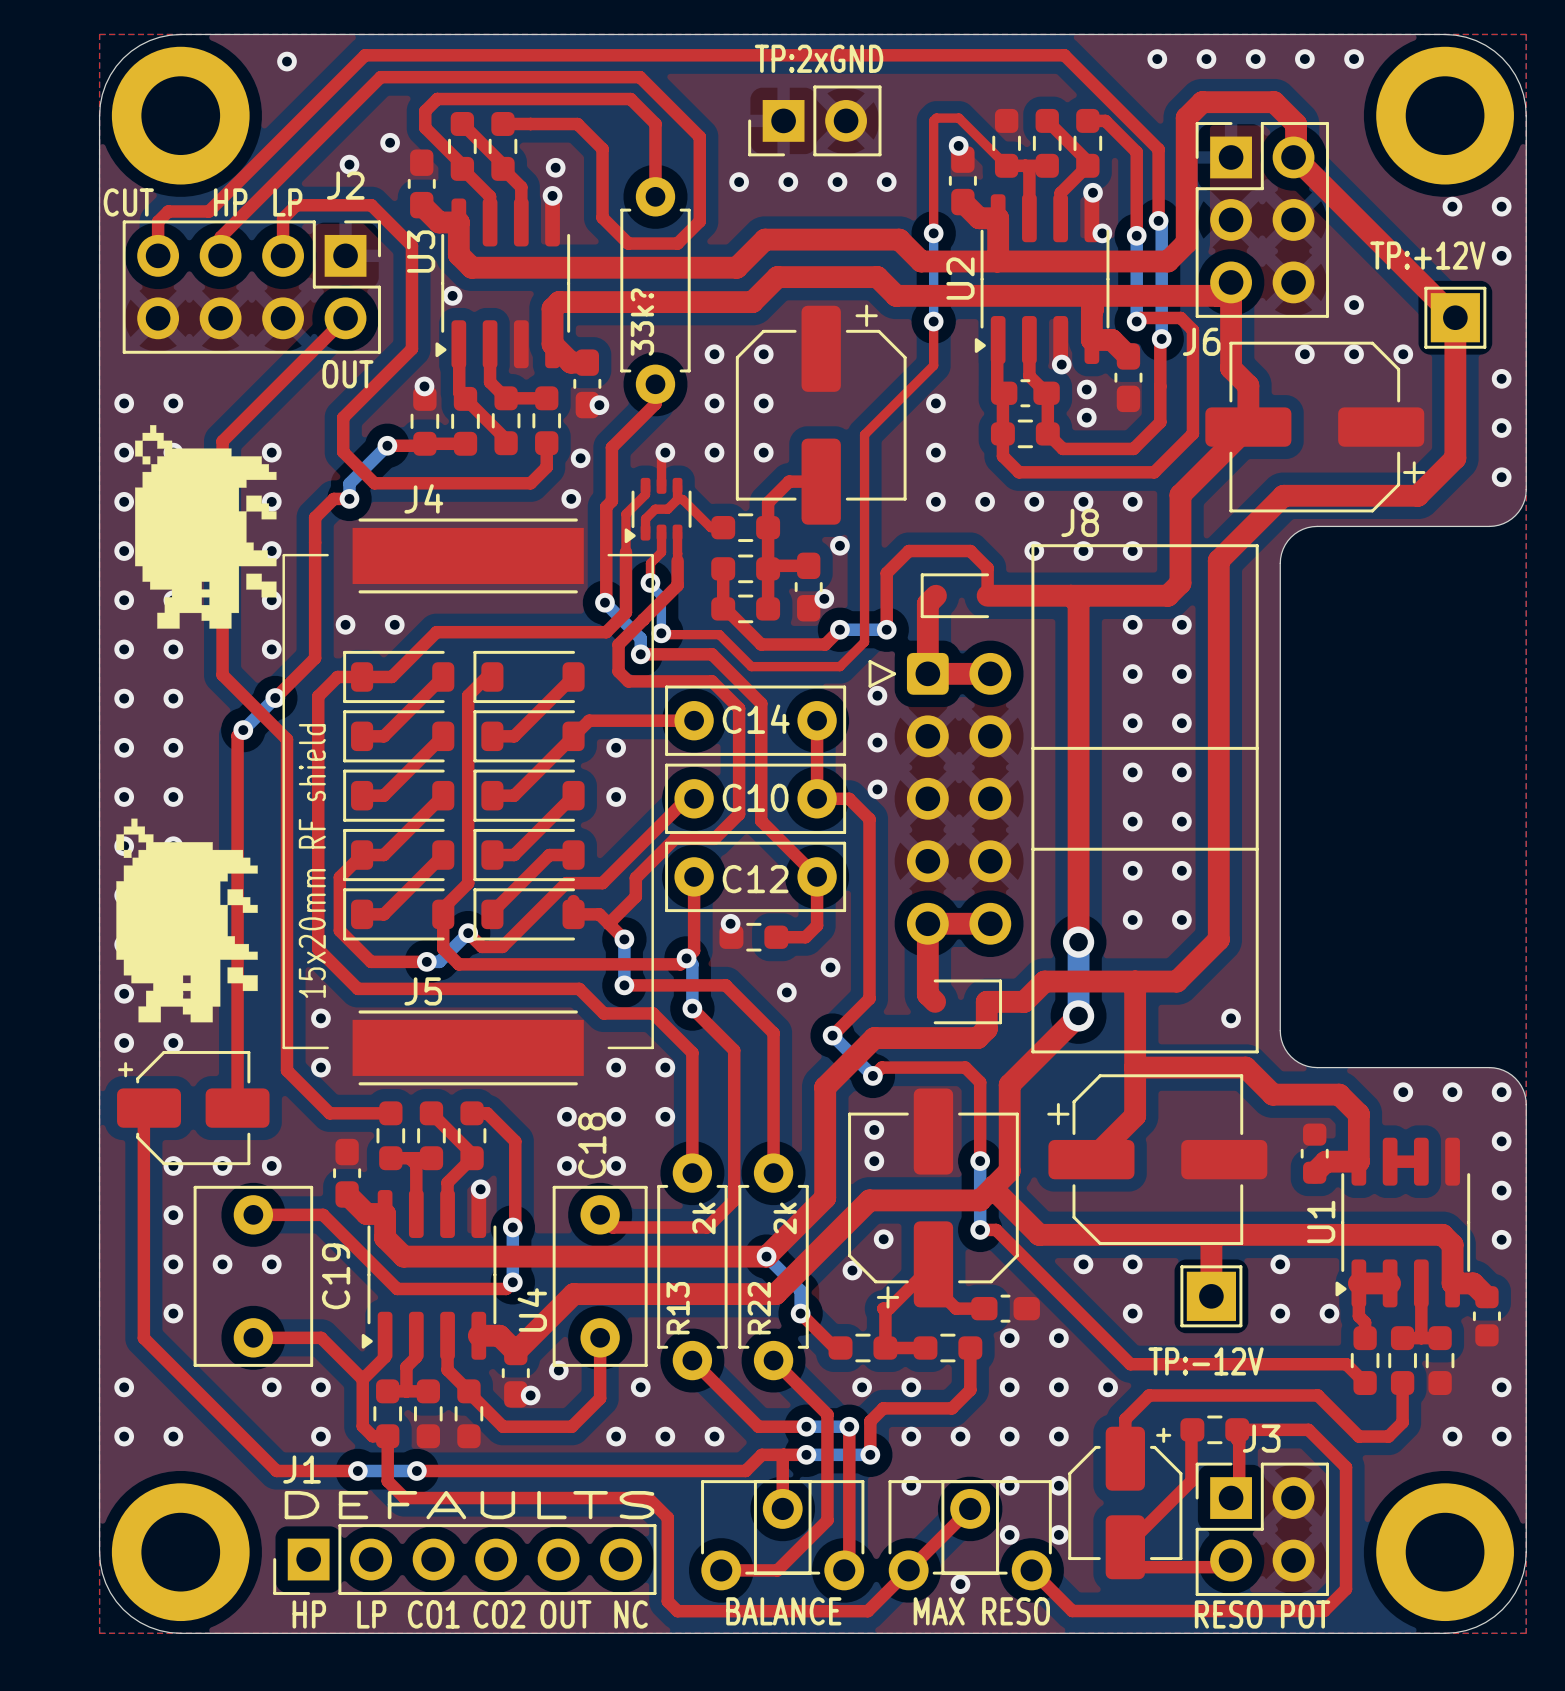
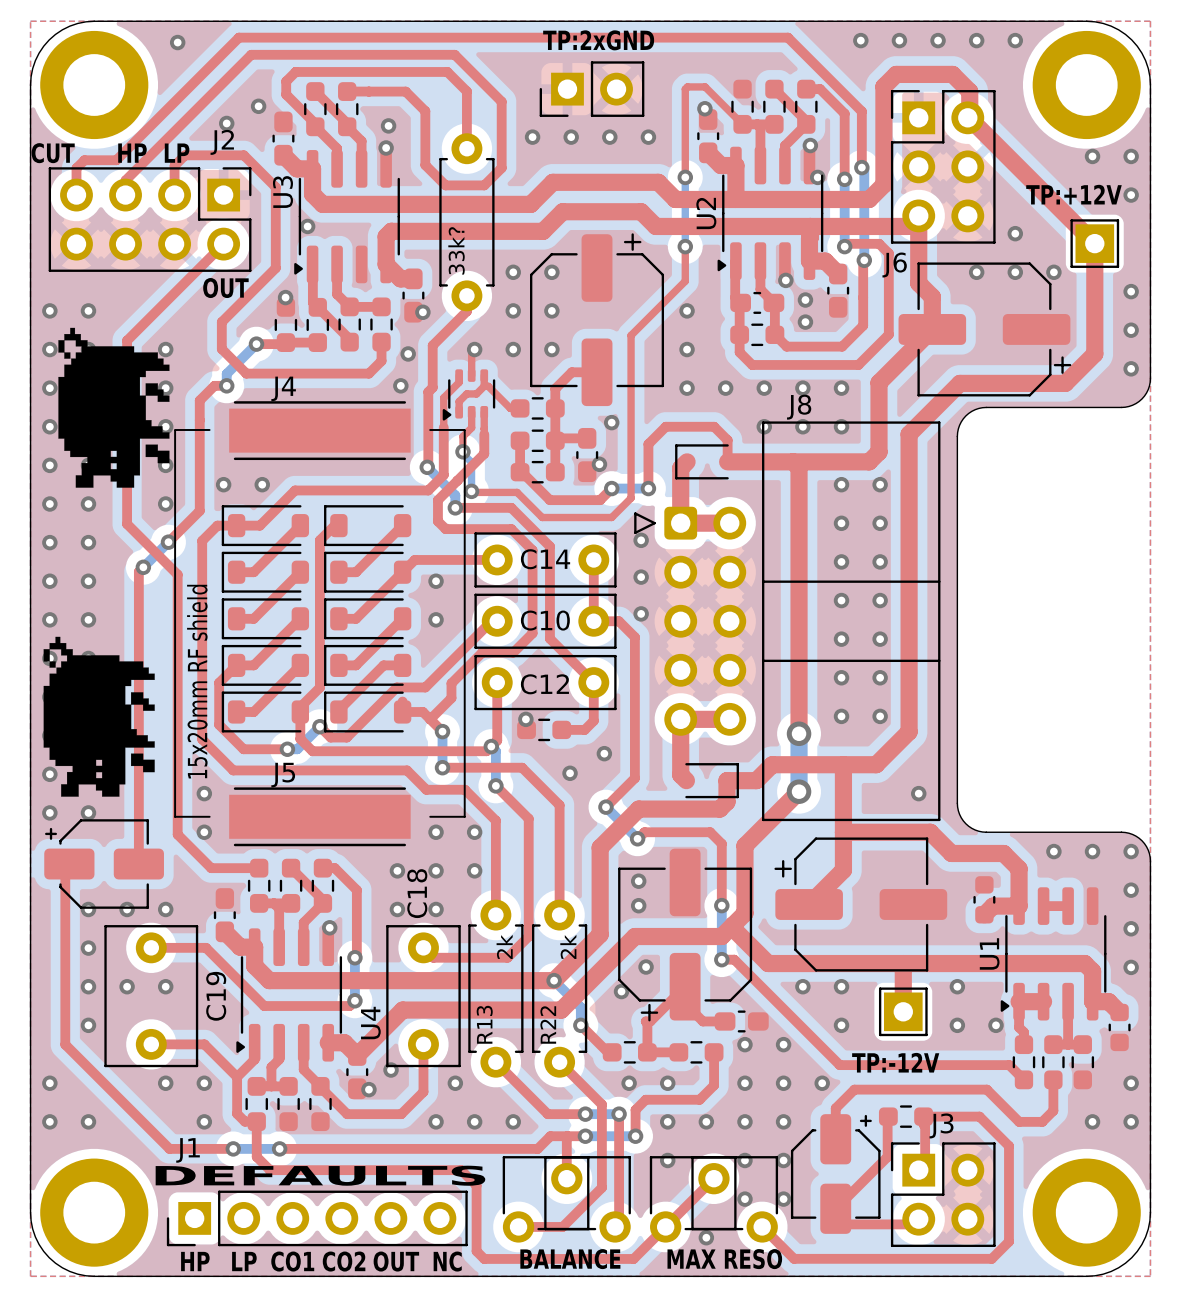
text: RESO POT (1262, 1614) -> none

